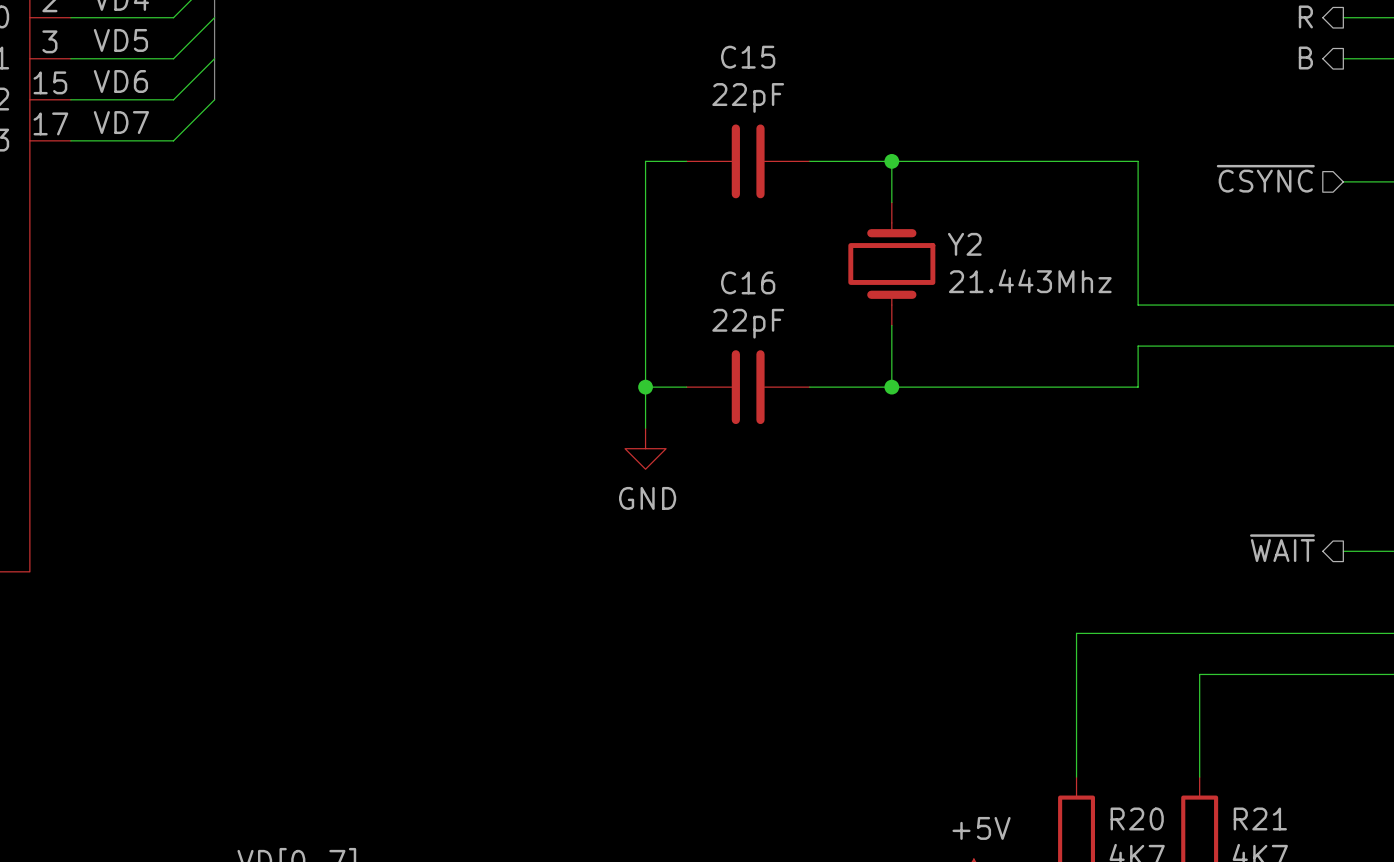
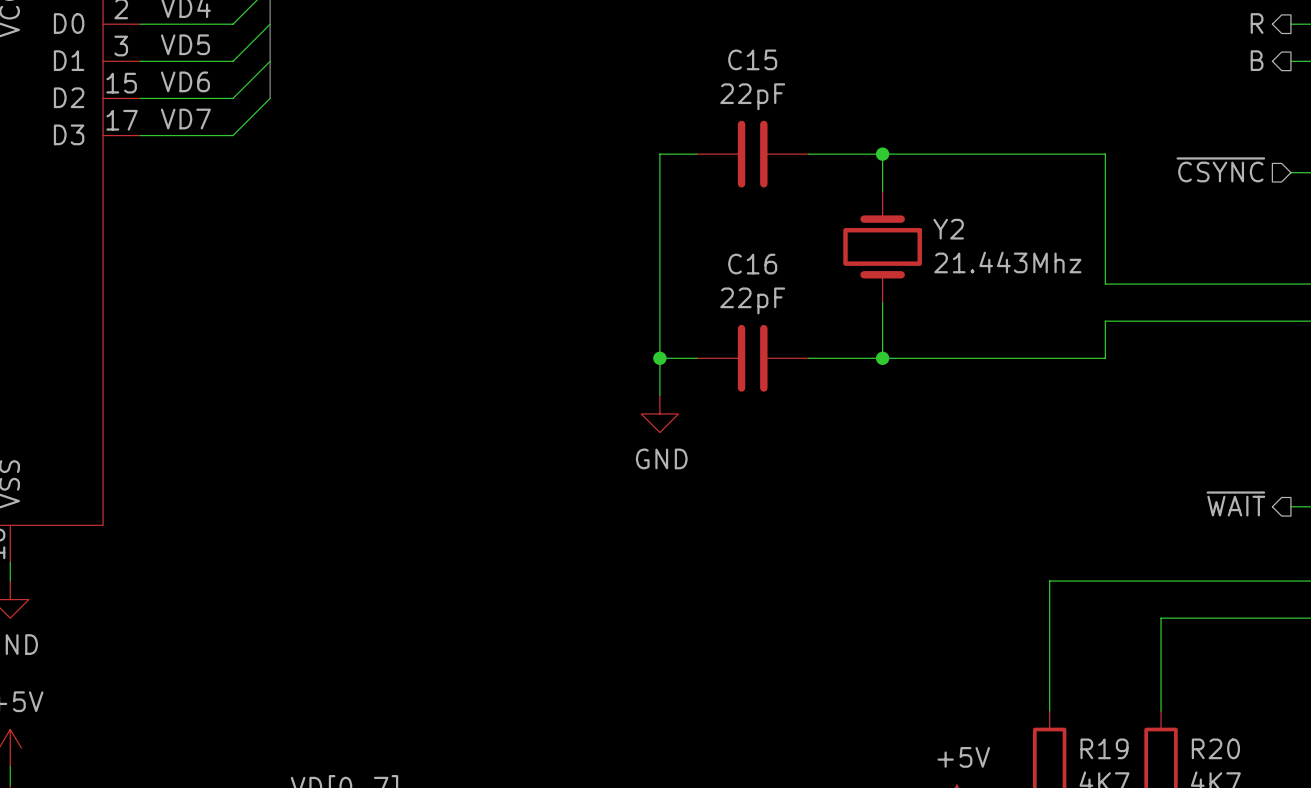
R20 name: R20 (1137, 818) -> R19 (1104, 748)
R21 name: R21 (1260, 818) -> R20 (1215, 748)

